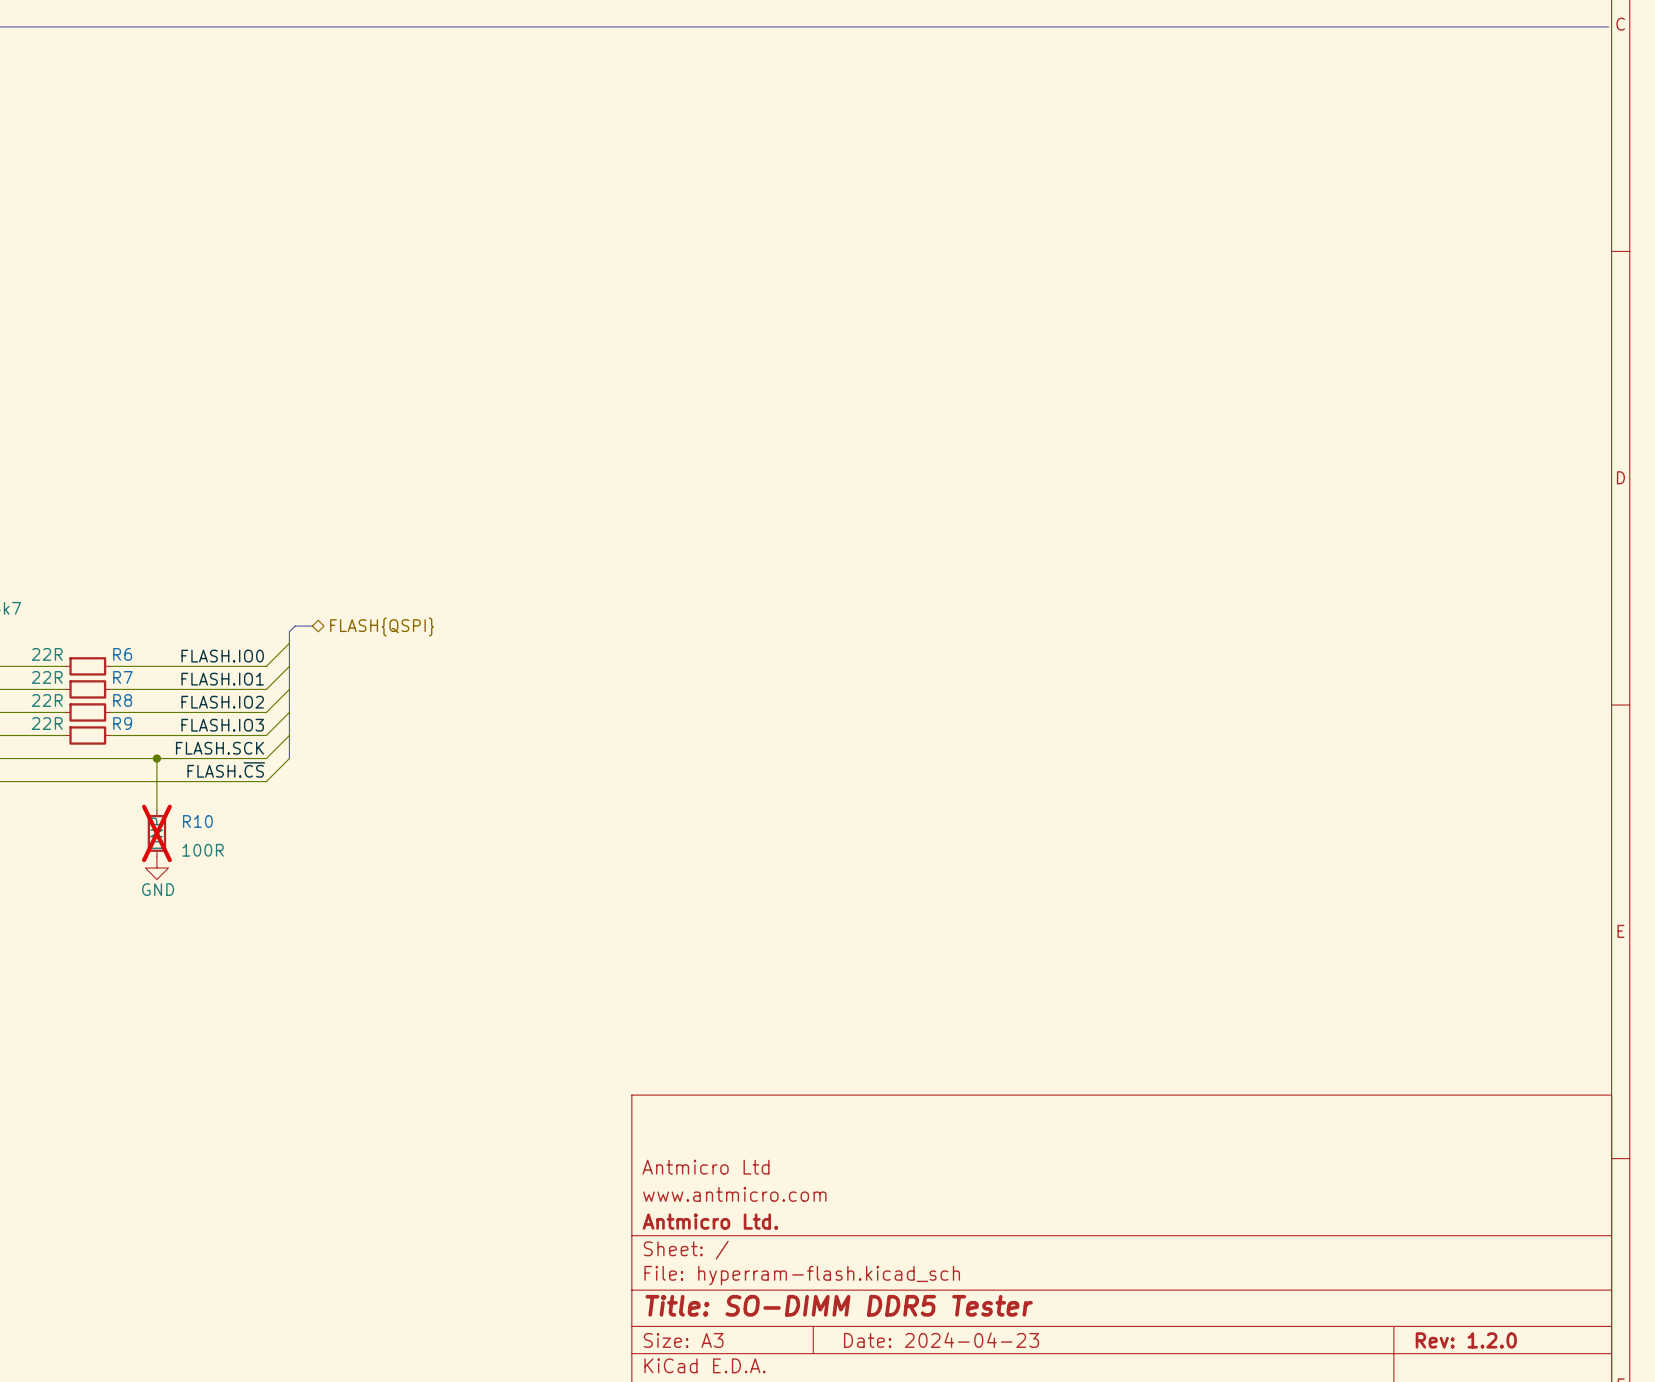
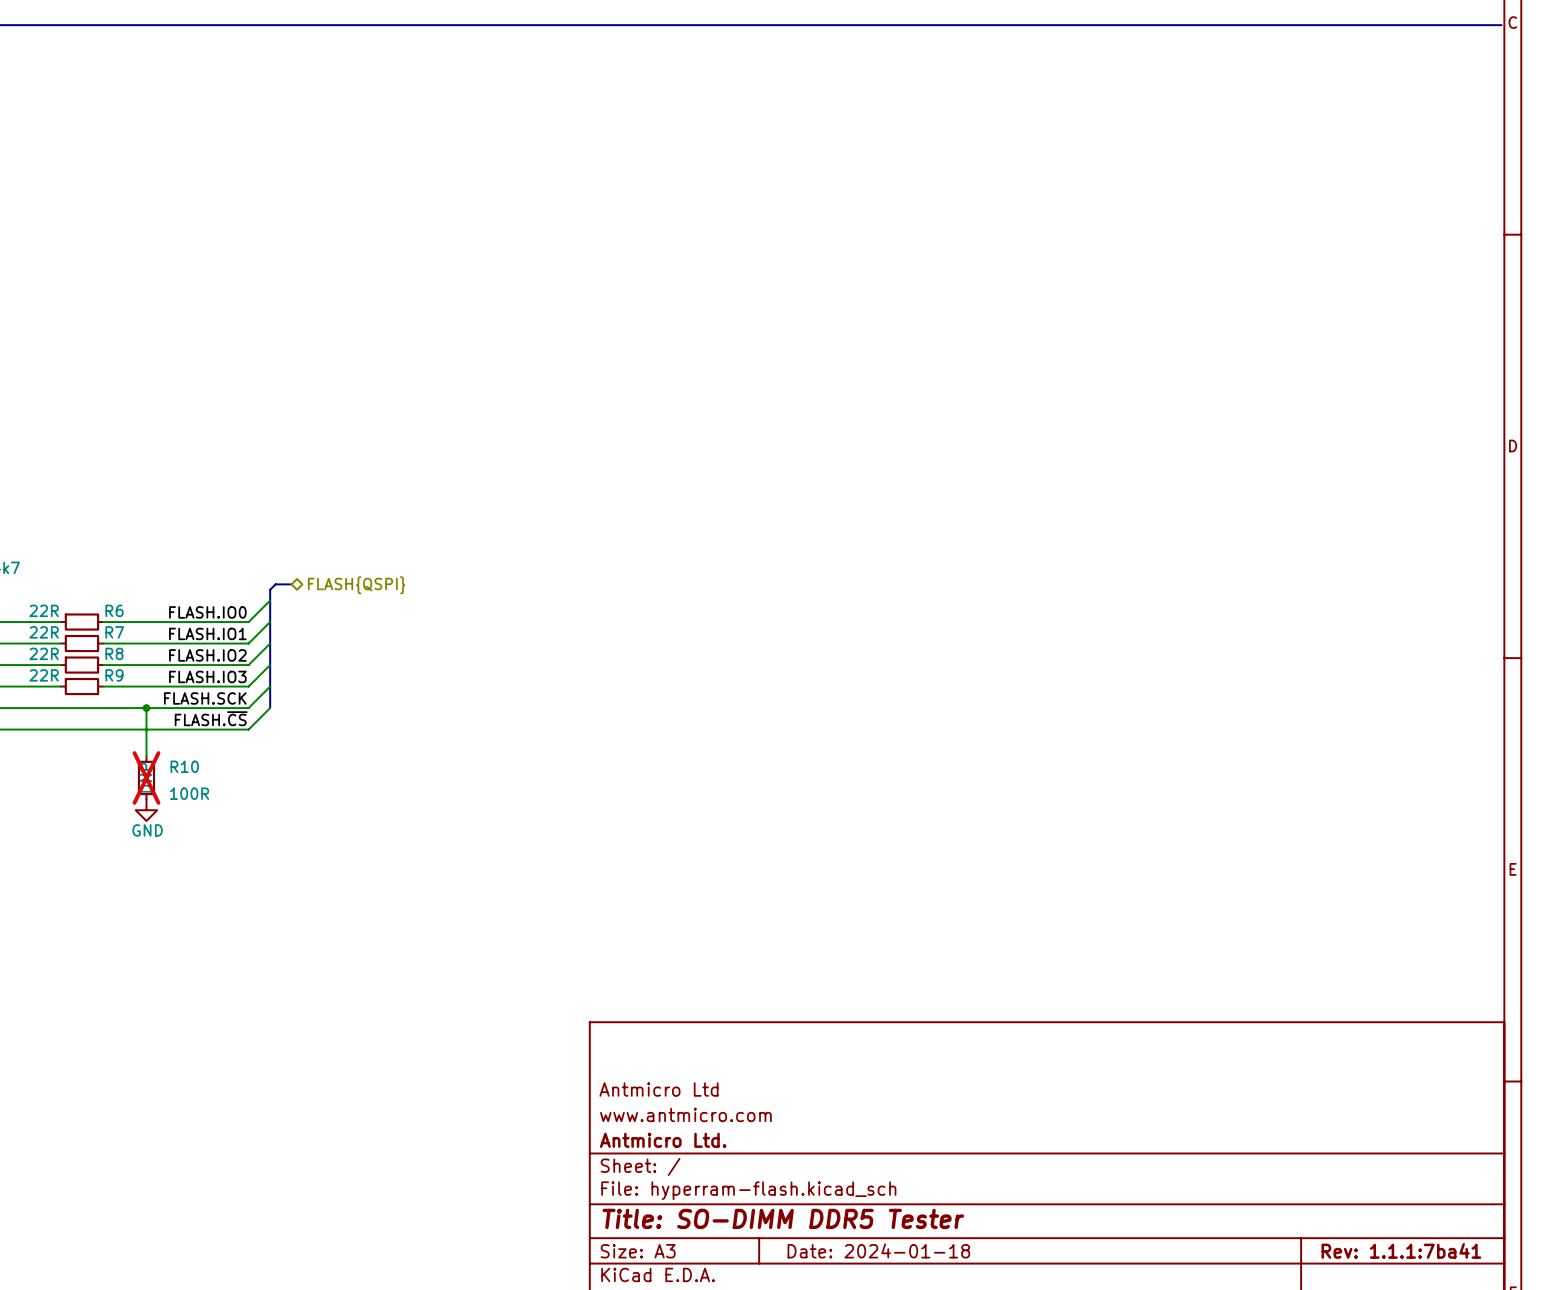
title block: Date: 2024-04-23 (941, 1340) -> Date: 2024-01-18 (878, 1250)
title block: Rev: 1.2.0 (1466, 1340) -> Rev: 1.1.1:7ba41 (1401, 1250)

